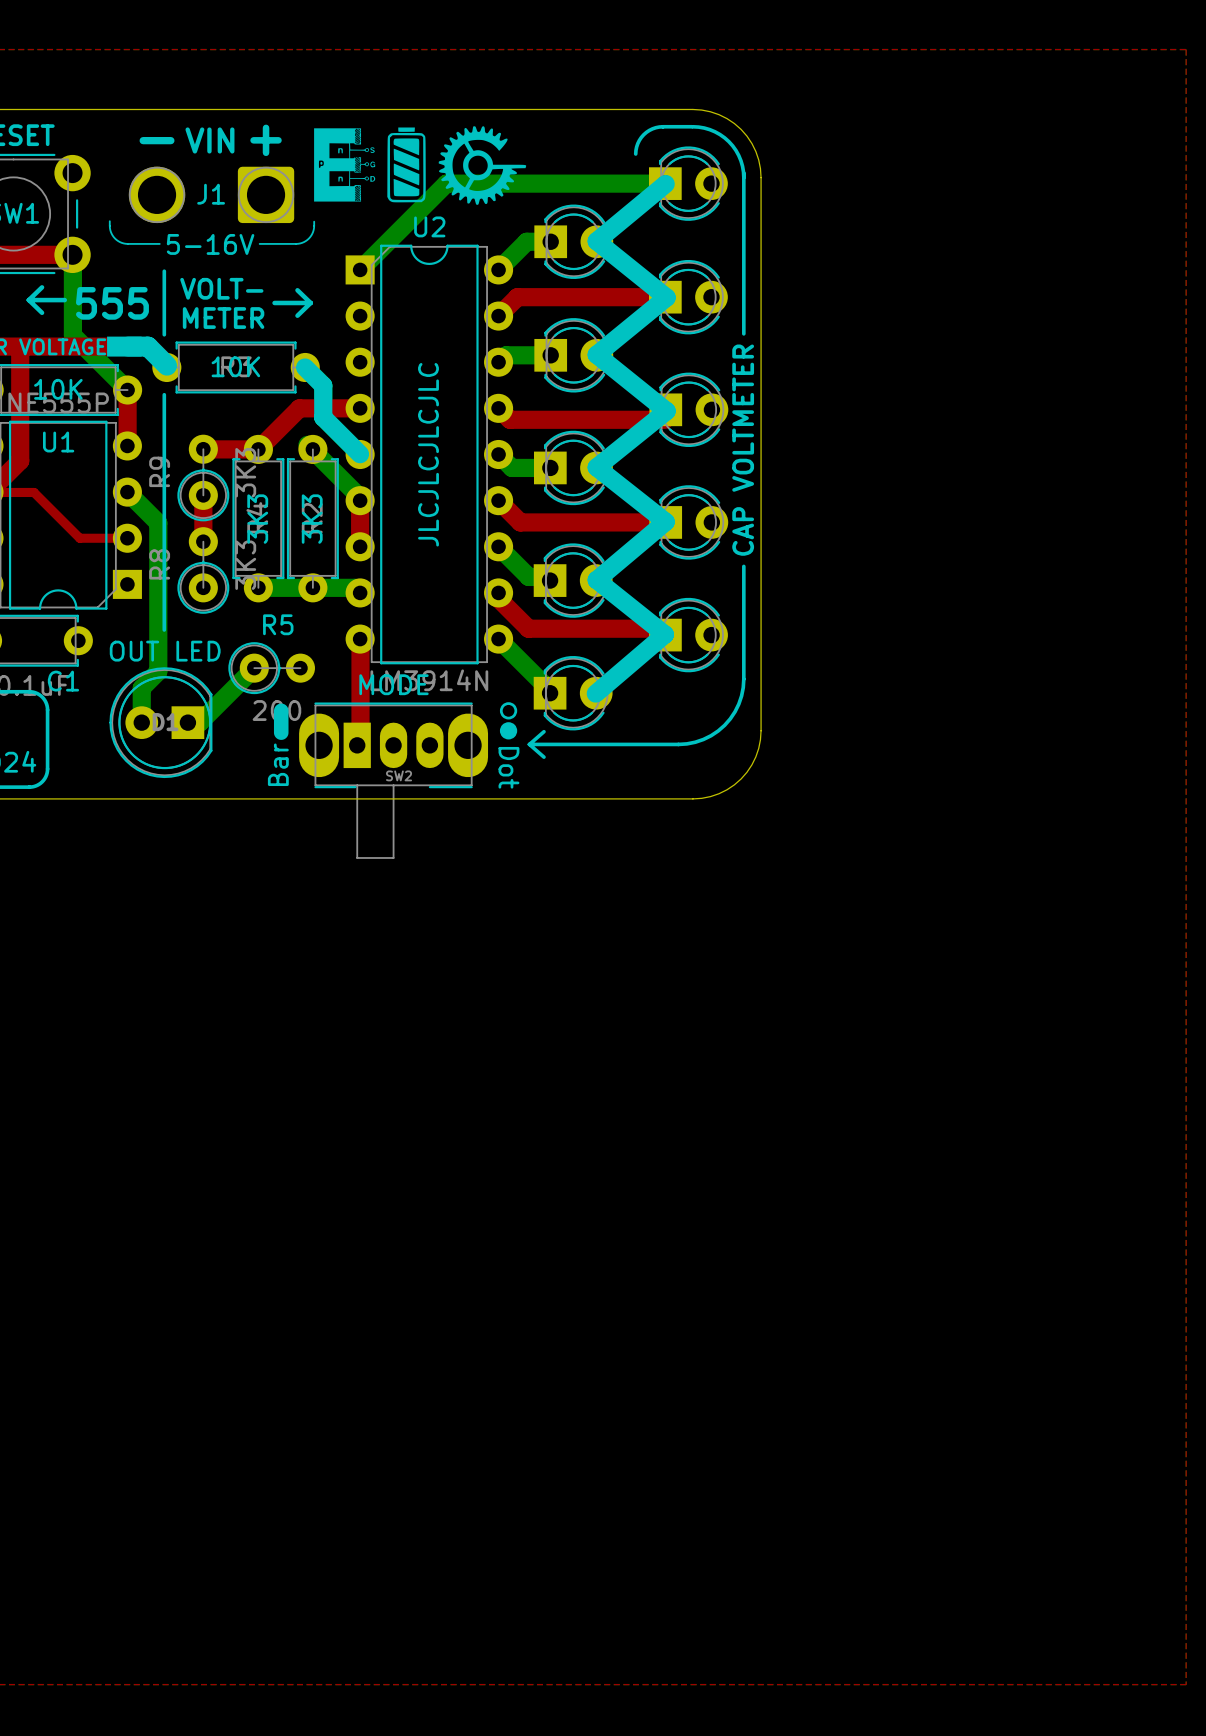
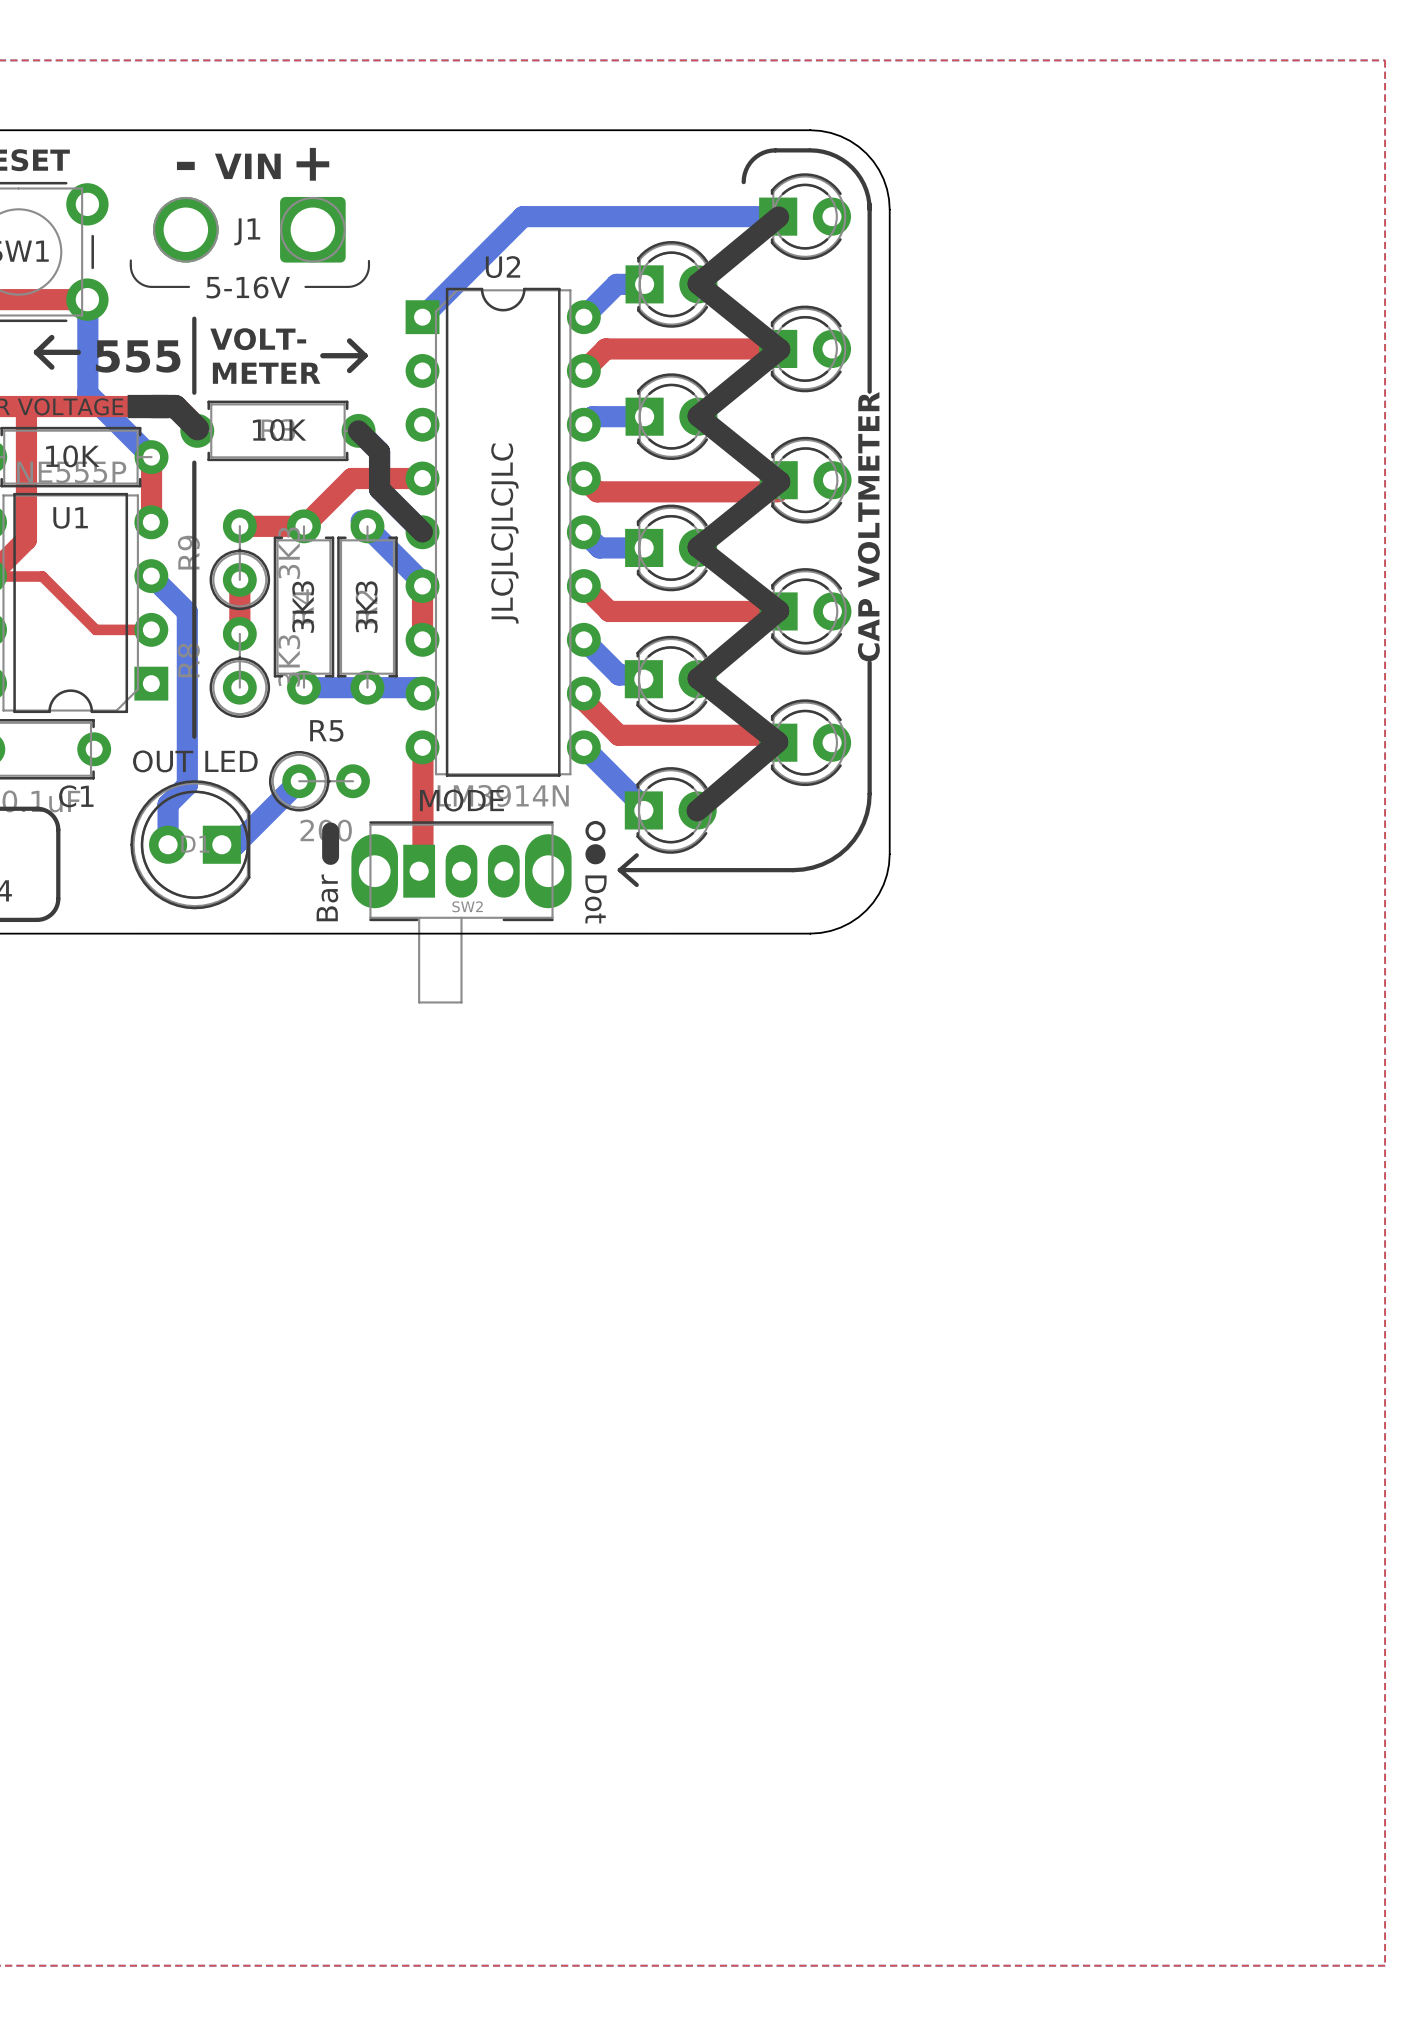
drawing: [314, 126, 527, 205] -> none

